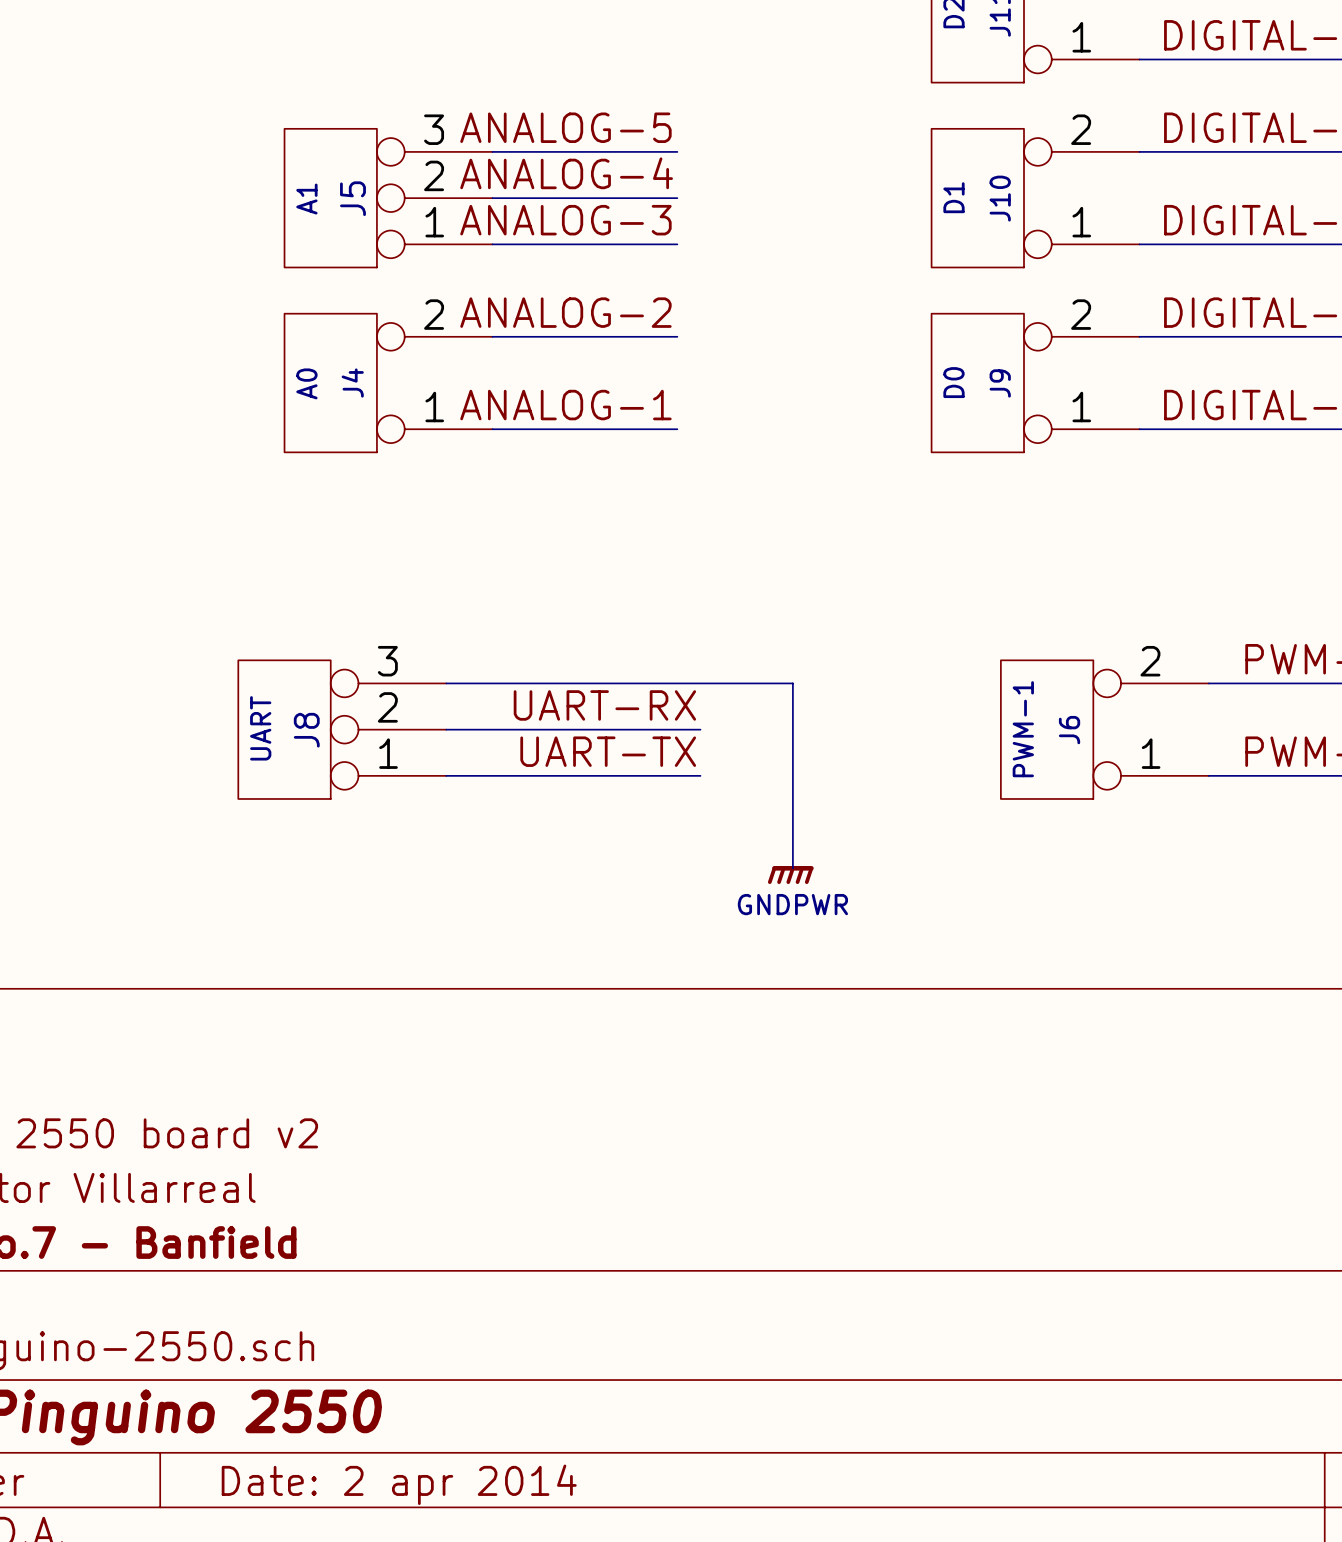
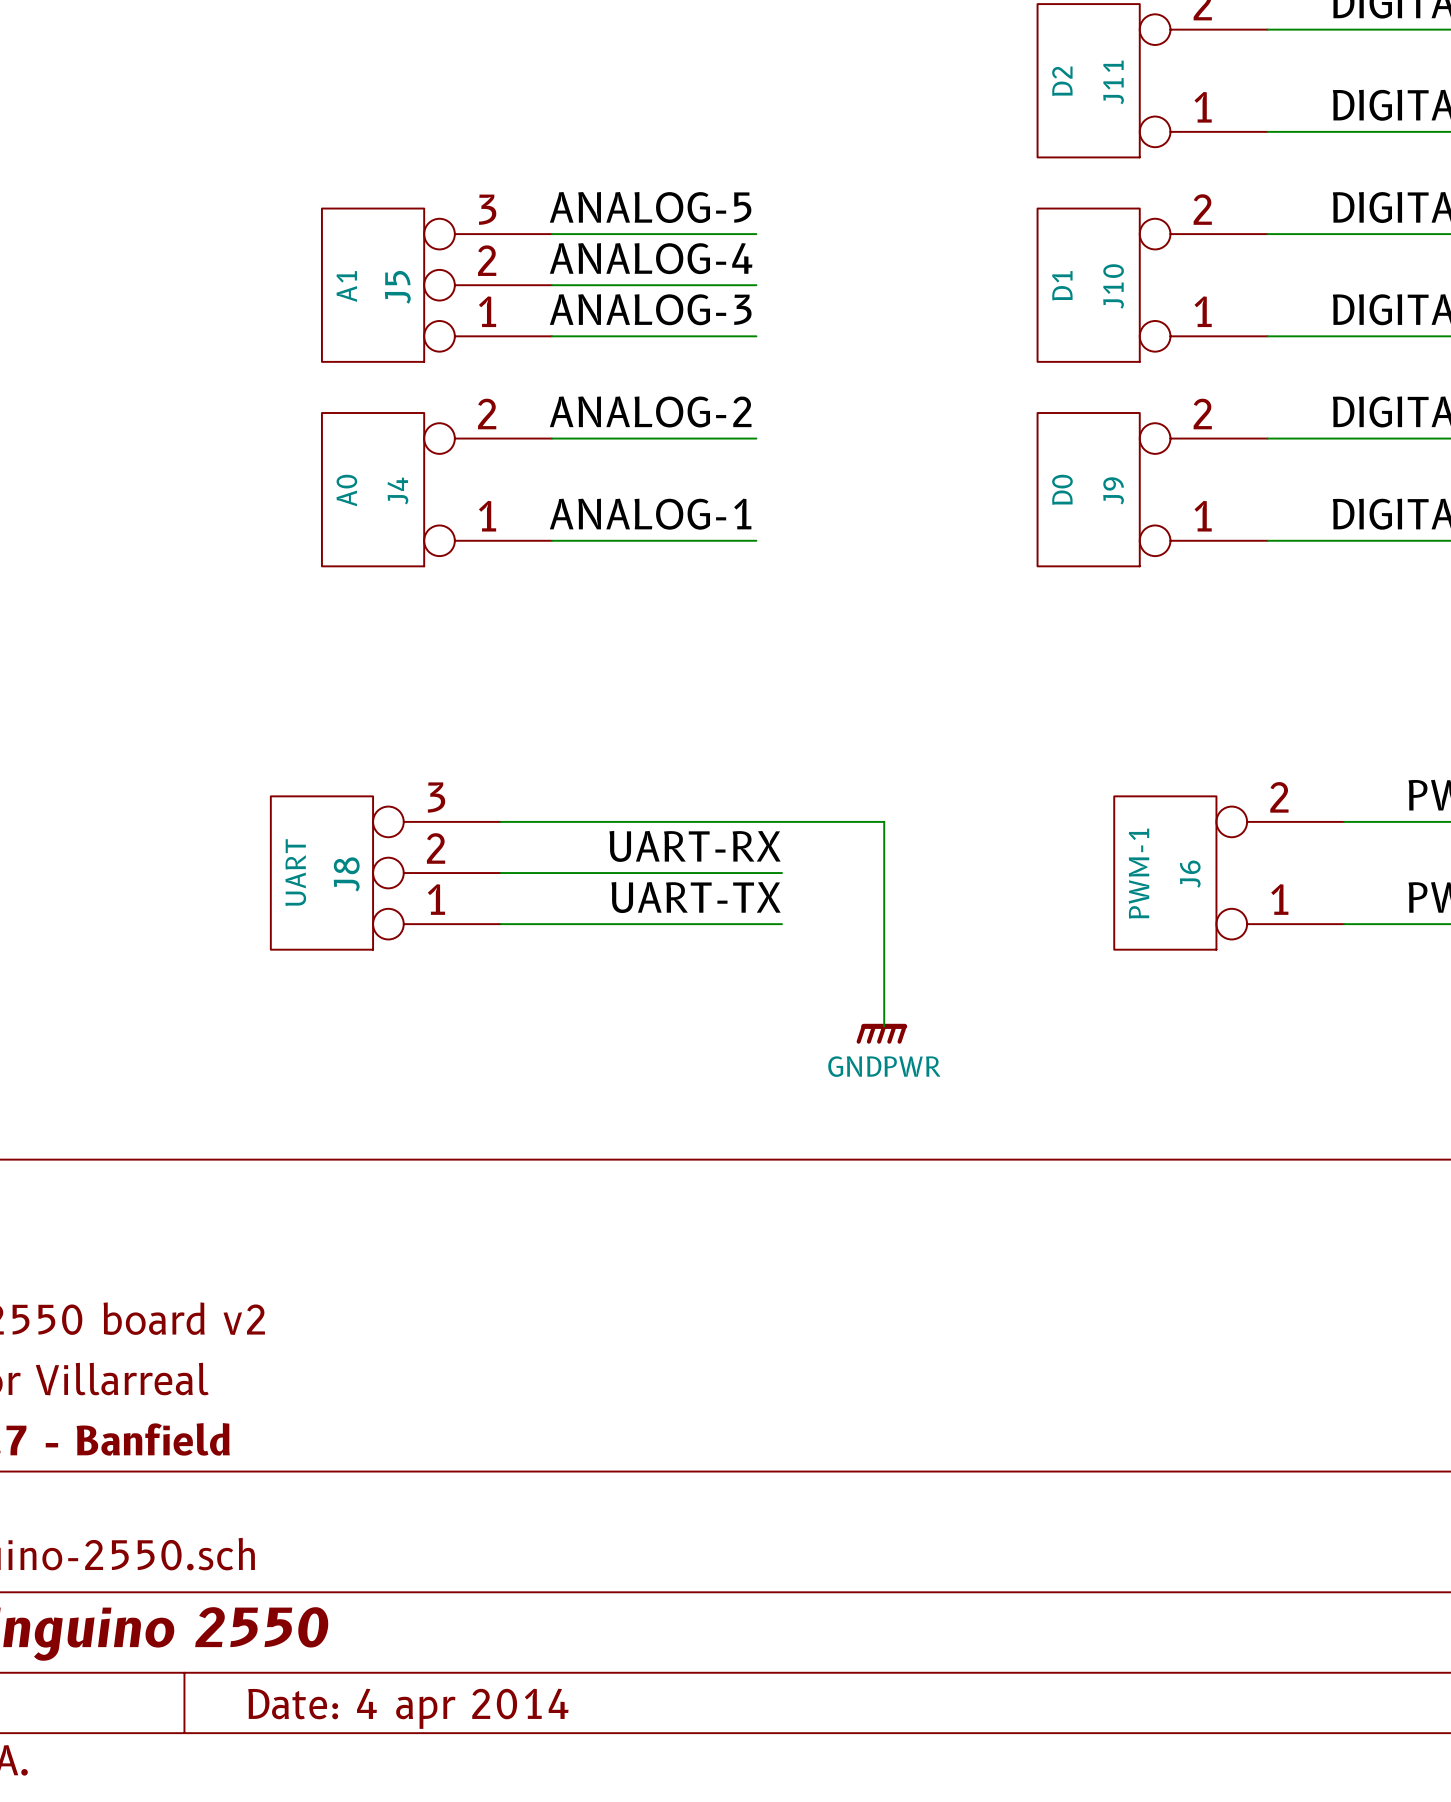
title block: Date: 2 apr 2014 (399, 1484) -> Date: 4 apr 2014 (408, 1708)

